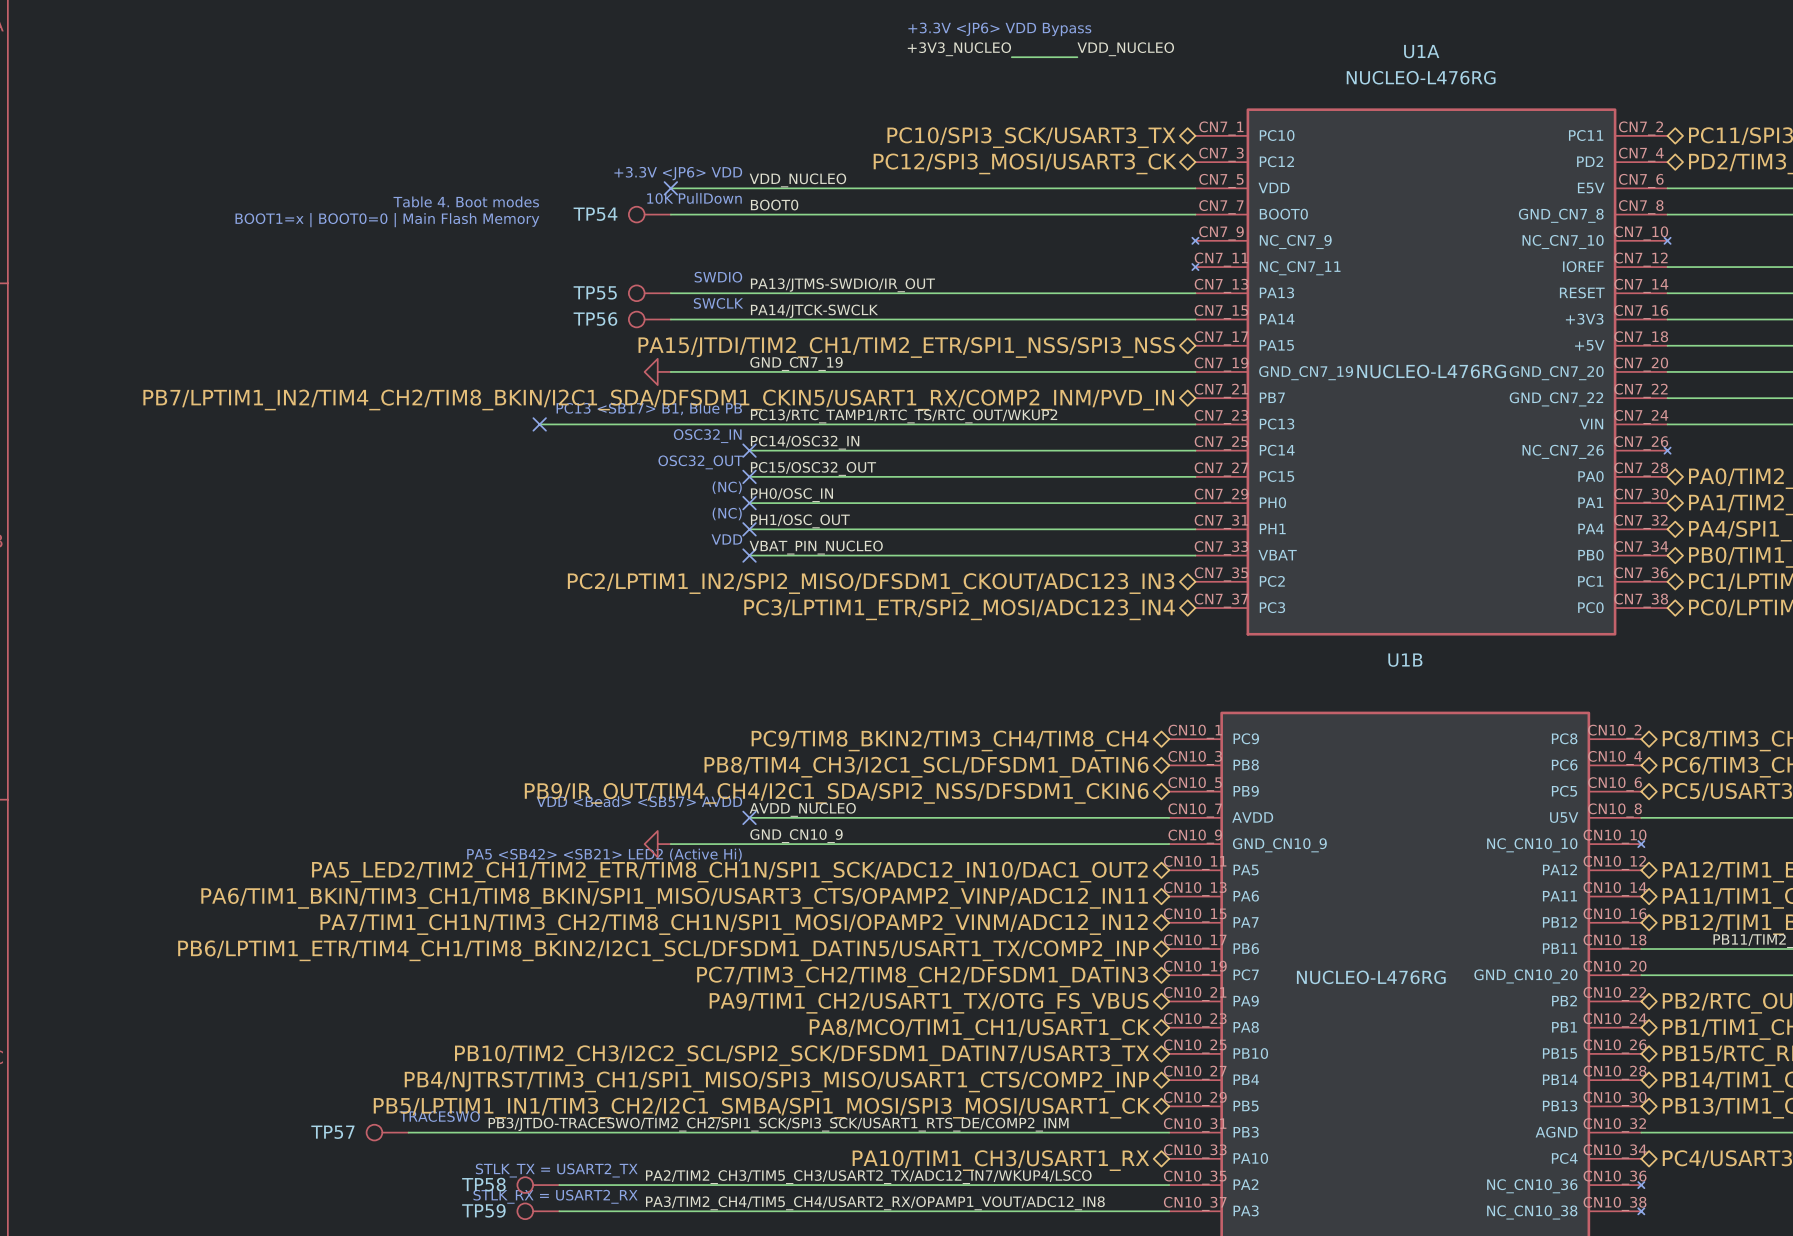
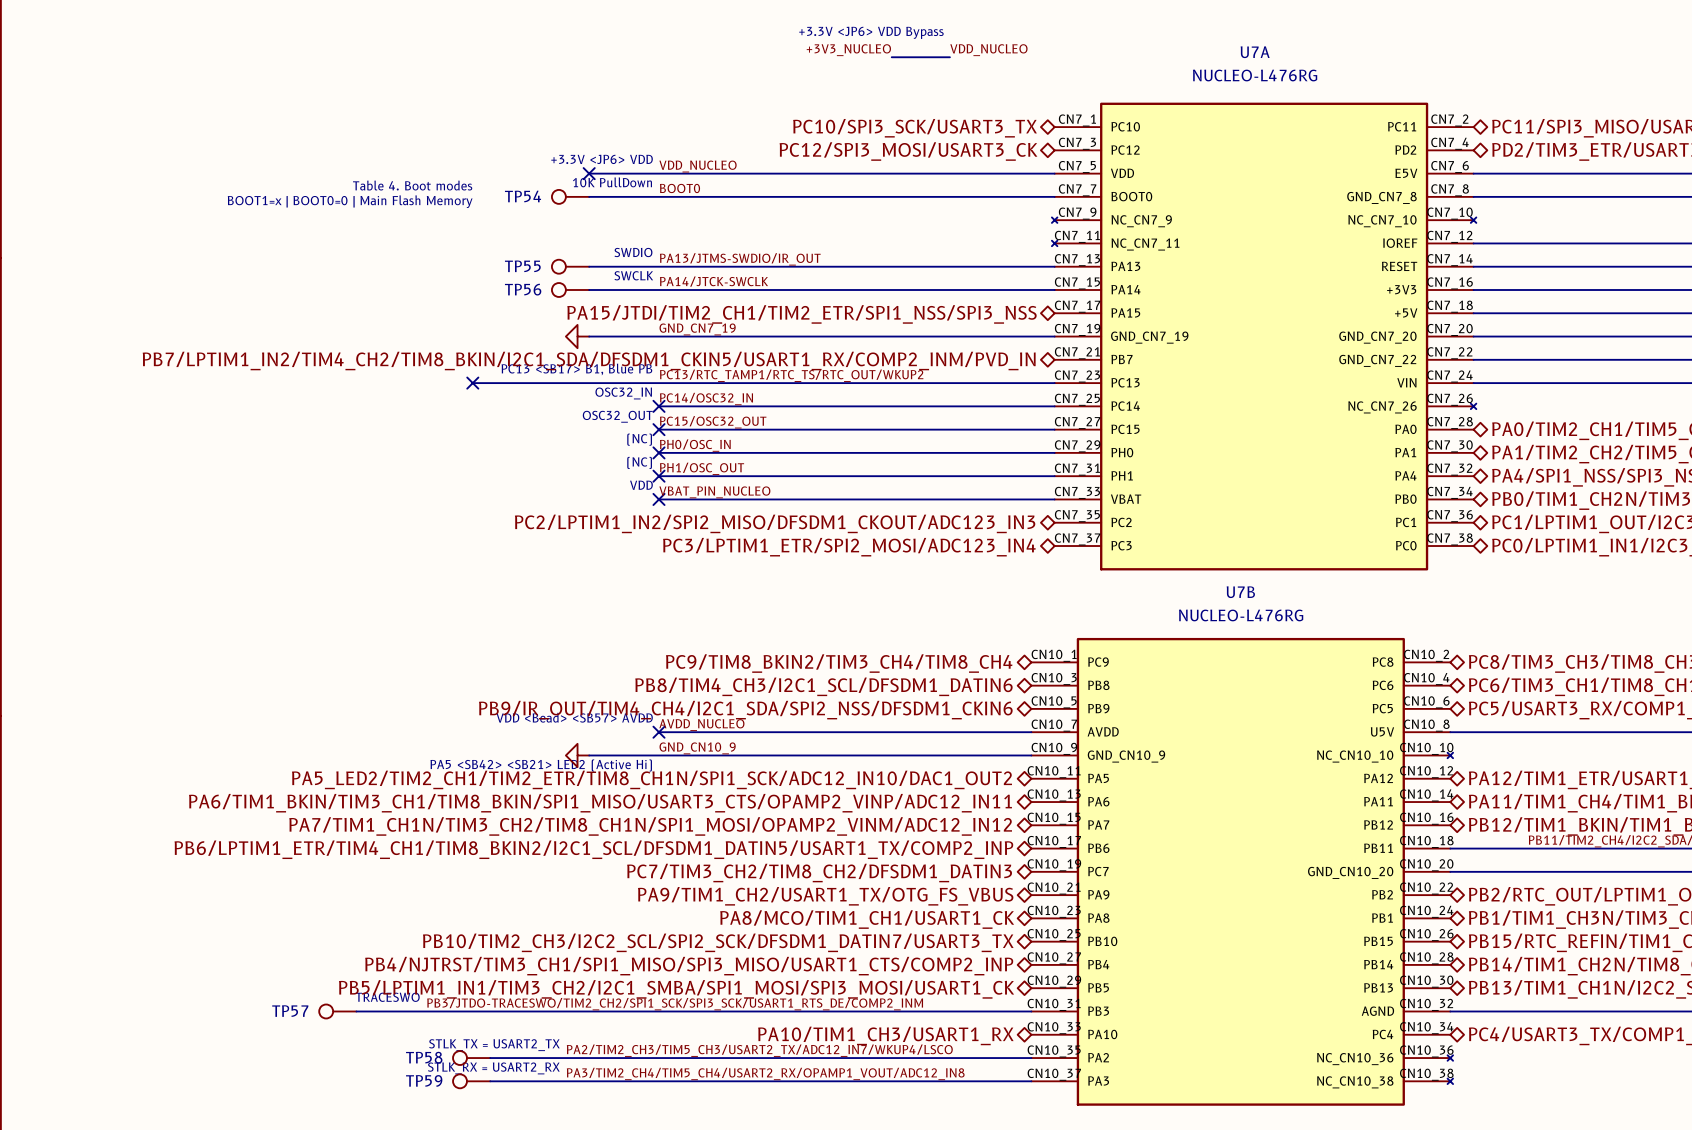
U1A name: U1A (1421, 51) -> U7A (1255, 52)
U1A text: NUCLEO-L476RG (1431, 371) -> none
U1B name: U1B (1405, 660) -> U7B (1240, 592)
U1B value: none -> NUCLEO-L476RG (1241, 615)
U1B text: NUCLEO-L476RG (1371, 977) -> none

